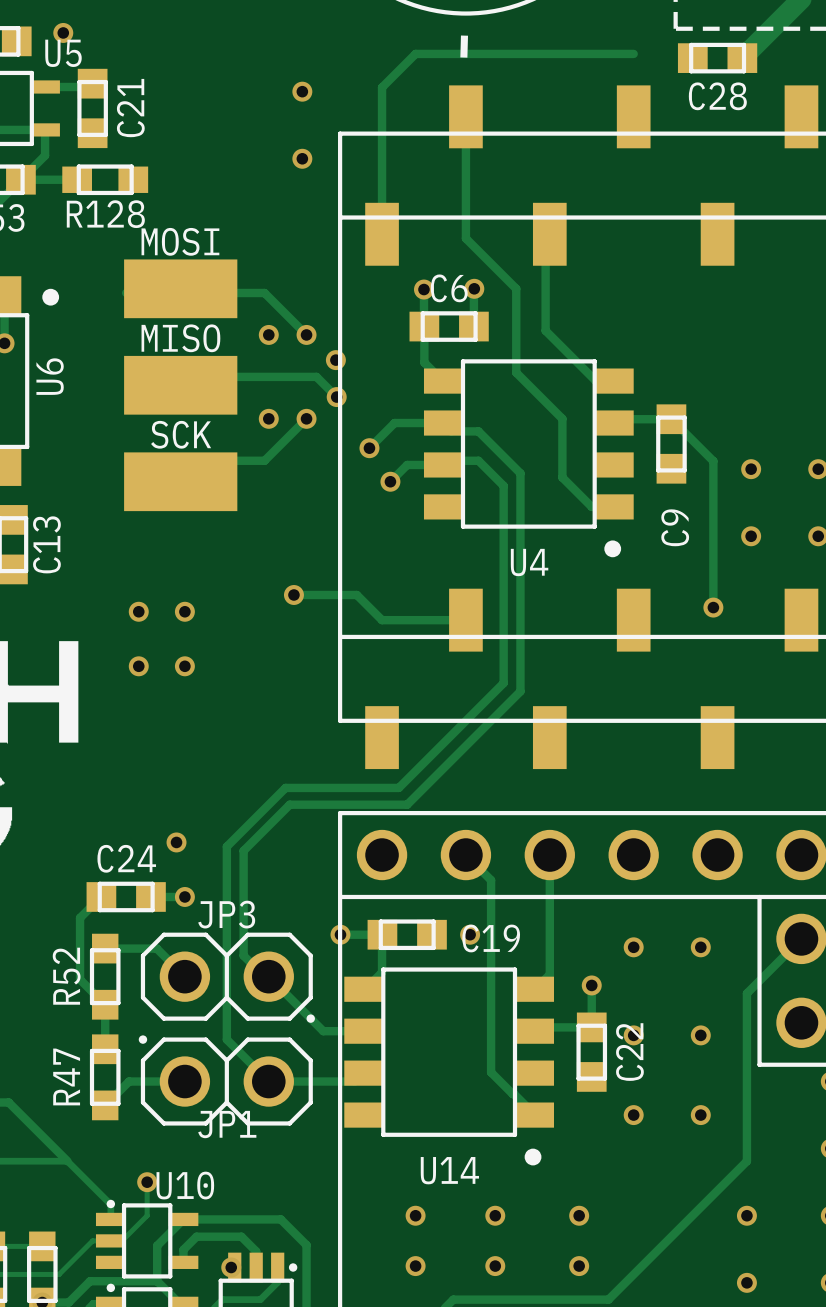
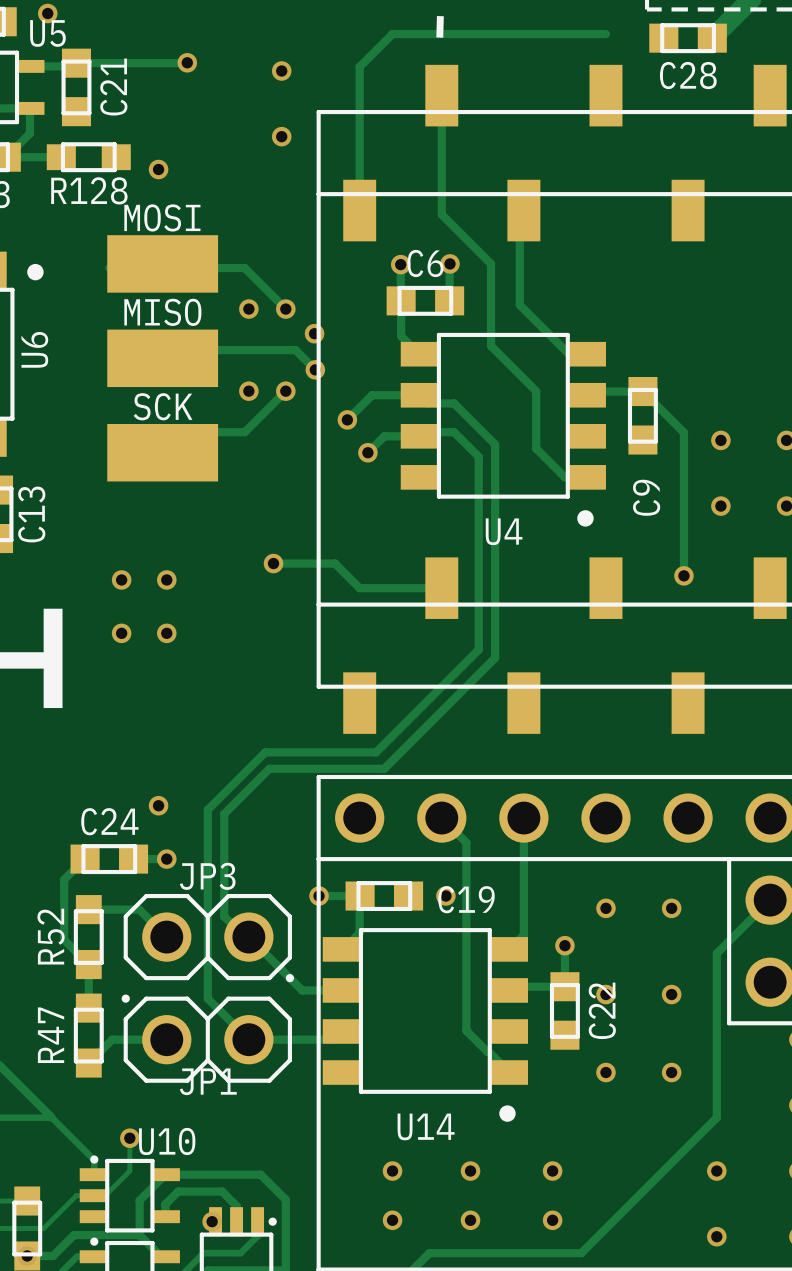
track: none -> (76, 63) (186, 63)
via: none -> (187, 62)
via: none -> (158, 169)

